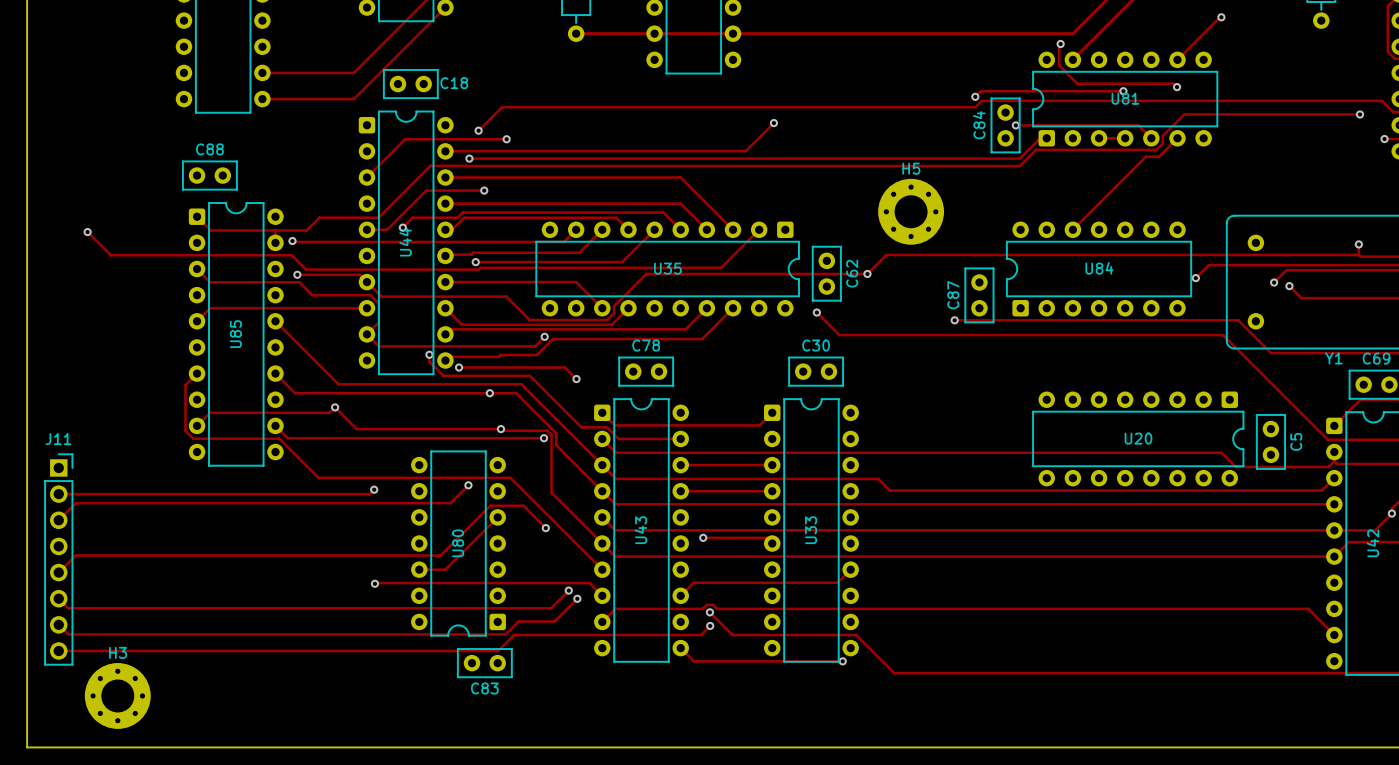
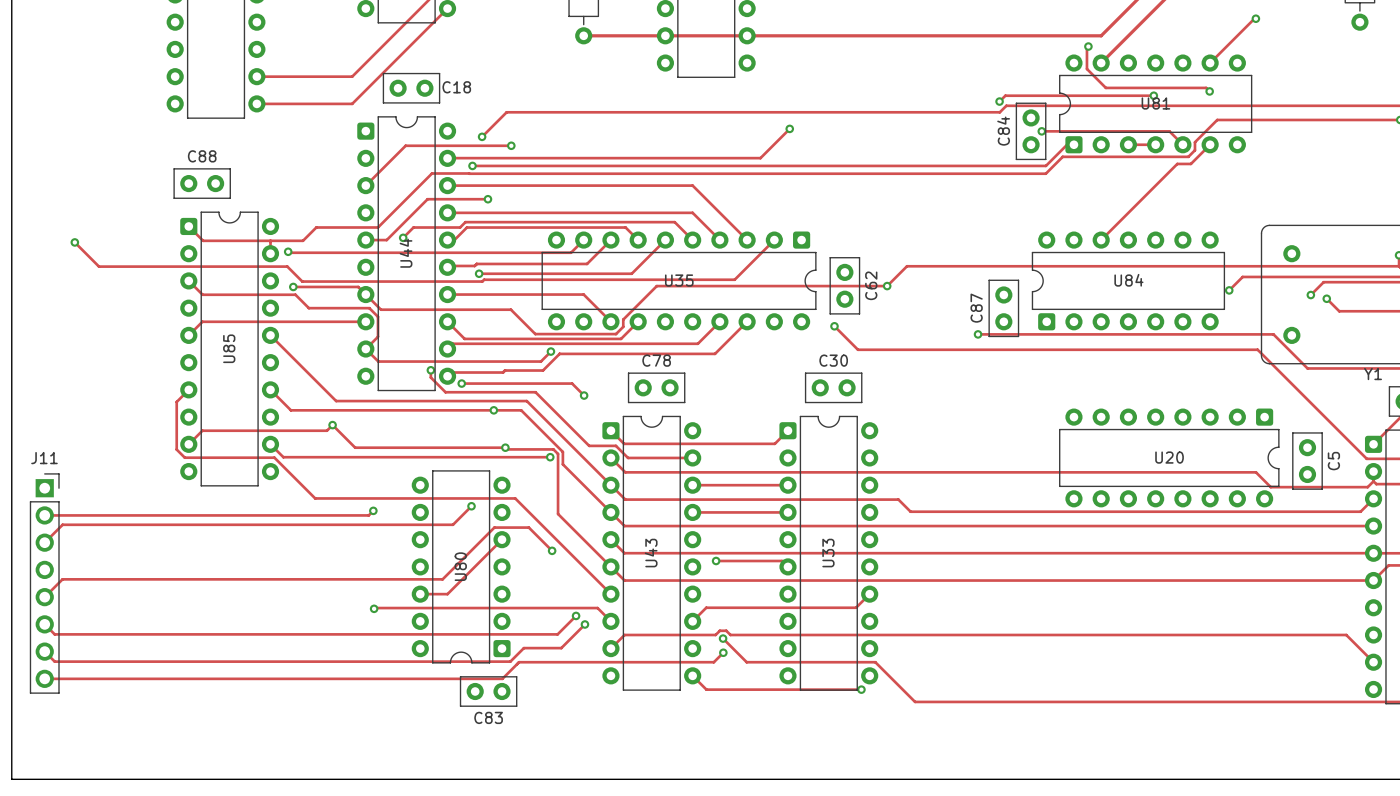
H5: (911, 211) -> none
H3: (117, 695) -> none

